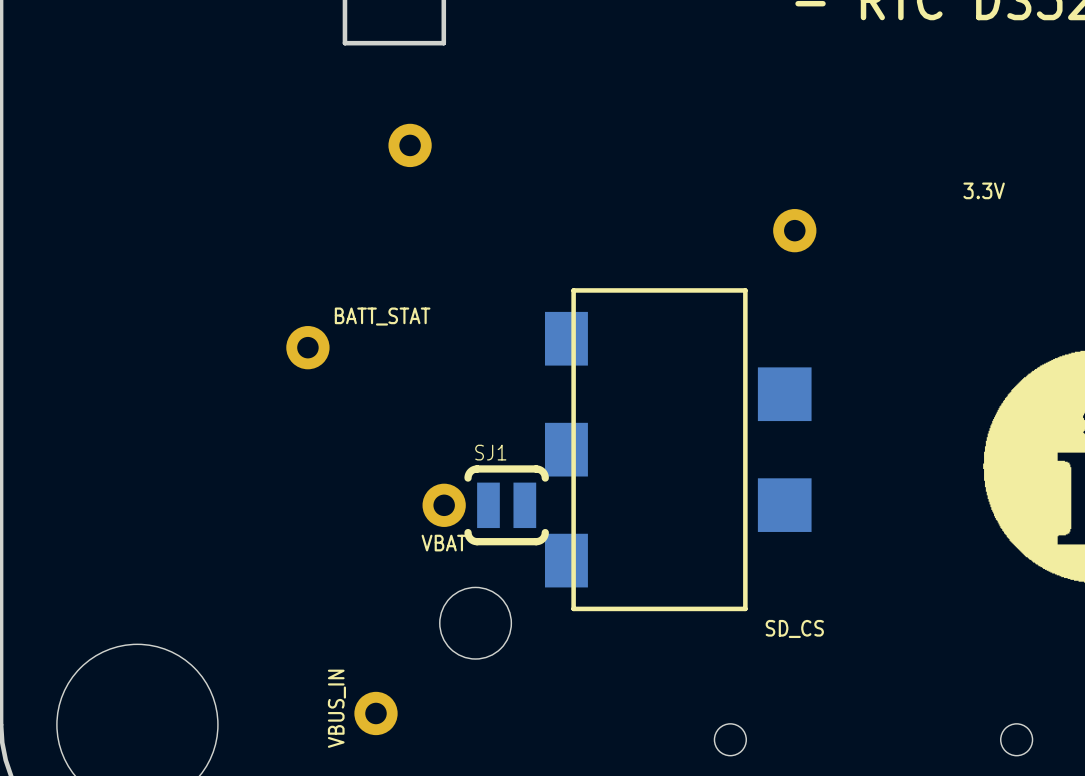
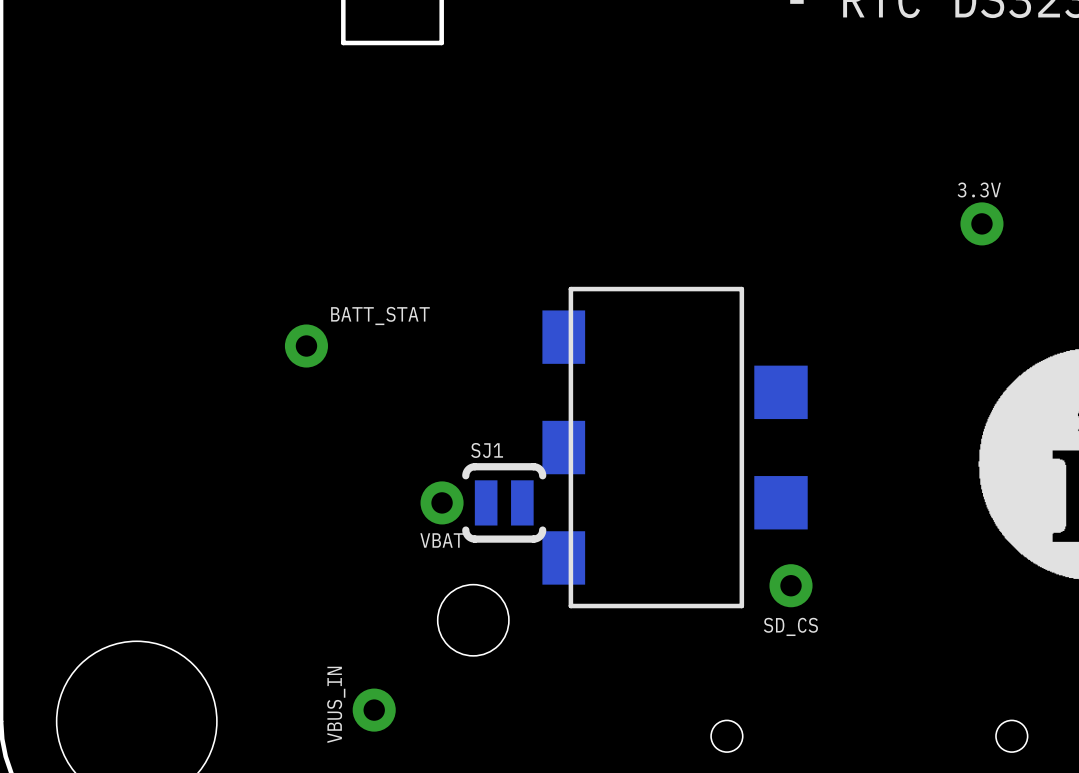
part: (410, 145) -> none
part: none -> (981, 223)
part: (794, 230) -> none
part: none -> (791, 585)

